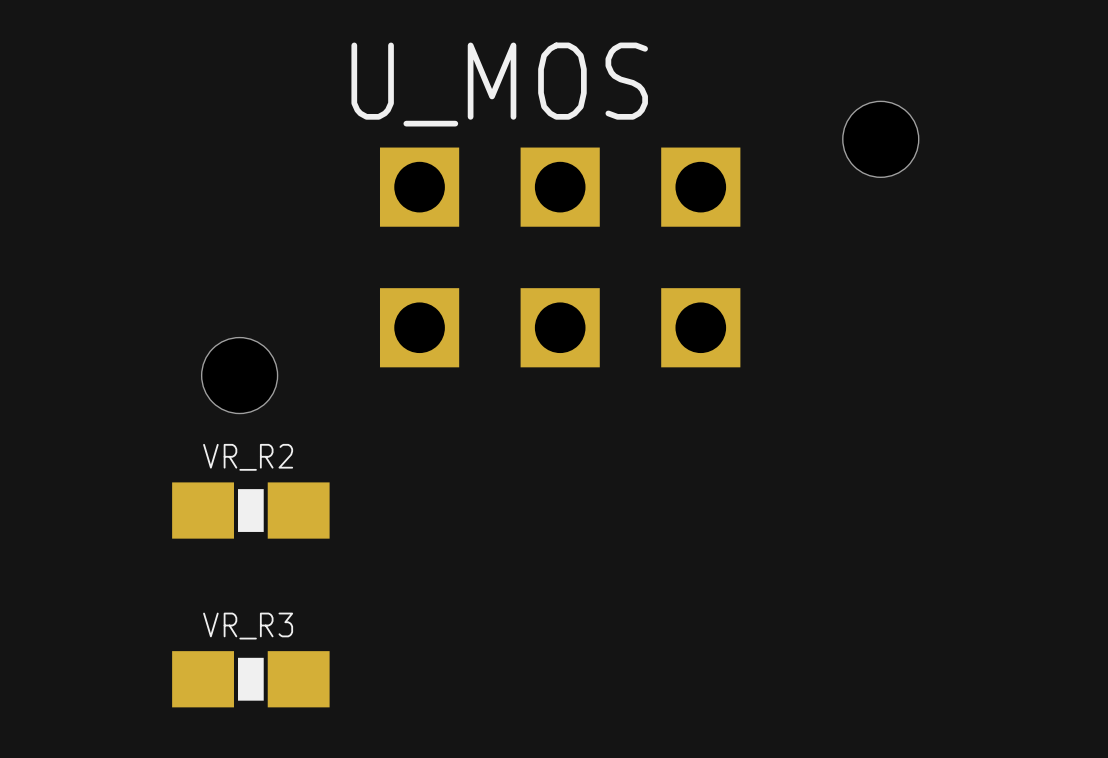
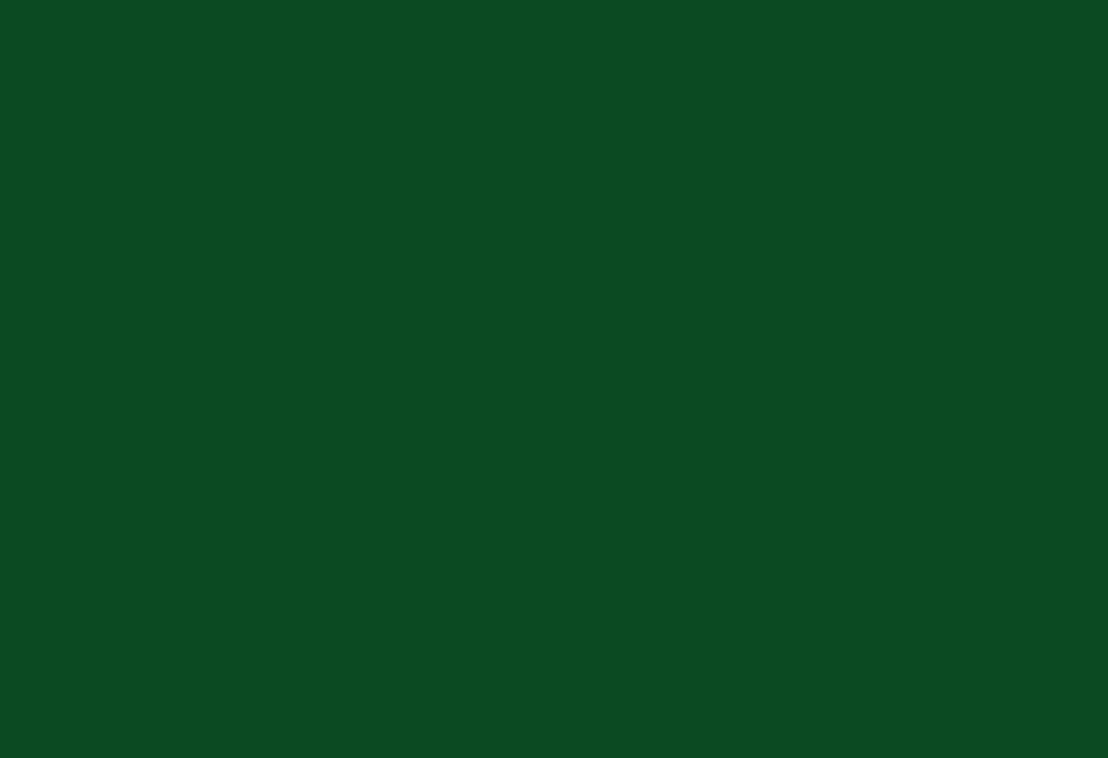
U_MOS: (560, 257) -> none
VR_R2: (250, 510) -> none
VR_R3: (250, 679) -> none

